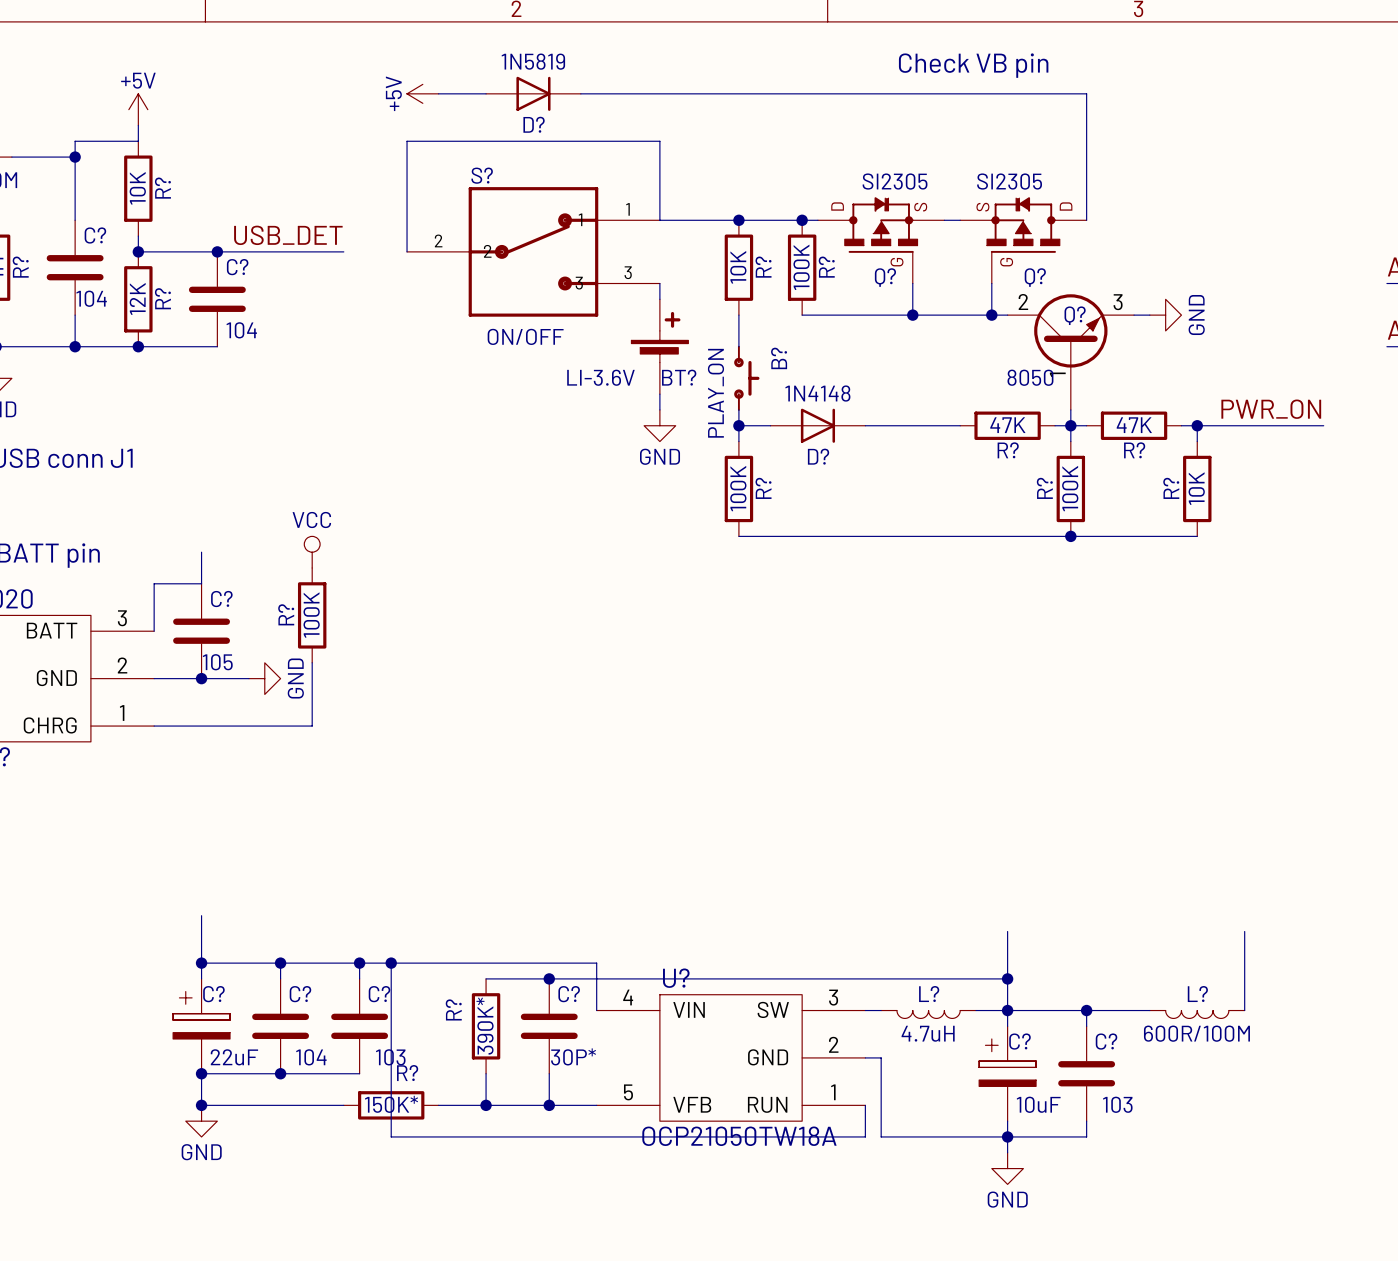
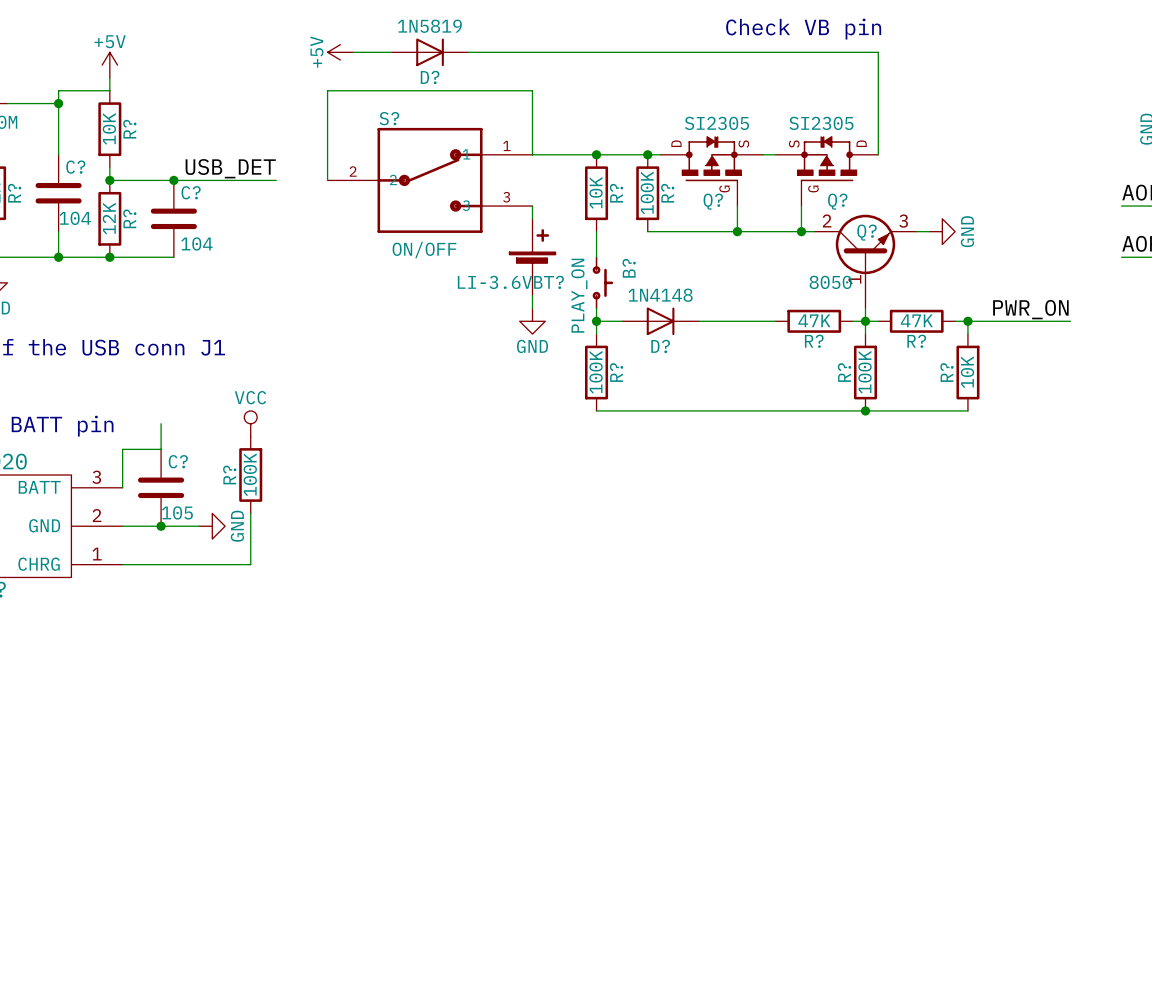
wire: (201, 915) (201, 978) -> none
wire: (1007, 931) (1007, 1026) -> none
wire: (1244, 931) (1244, 1010) -> none
wire: (201, 963) (596, 963) (596, 1010) -> none
junction: (201, 963) -> none
wire: (280, 963) (280, 978) -> none
junction: (280, 963) -> none
wire: (359, 963) (359, 978) -> none
junction: (359, 963) -> none
wire: (391, 963) (391, 1136) (865, 1136) (865, 1105) -> none
junction: (391, 963) -> none
wire: (486, 978) (1007, 978) -> none
junction: (549, 978) -> none
junction: (1007, 978) -> none
wire: (865, 1010) (881, 1010) -> none
wire: (976, 1010) (1149, 1010) -> none
junction: (1007, 1010) -> none
wire: (1086, 1010) (1086, 1026) -> none
junction: (1086, 1010) -> none
L?: 4.7uH (928, 1014) -> none
L?: 600R/100M (1197, 1014) -> none
C?: 22uF (201, 1026) -> none
C?: 104 (280, 1026) -> none
C?: 103 (359, 1026) -> none
R?: 390K* (486, 1026) -> none
C?: 30P* (549, 1026) -> none
U?: OCP21050TW18A (731, 1057) -> none
wire: (865, 1057) (881, 1057) (881, 1136) (1086, 1136) (1086, 1121) -> none
junction: (201, 1073) -> none
junction: (280, 1073) -> none
wire: (359, 1073) (201, 1073) (201, 1105) (343, 1105) -> none
wire: (486, 1073) (486, 1105) -> none
wire: (549, 1073) (549, 1105) -> none
C?: 10uF (1007, 1073) -> none
C?: 103 (1086, 1073) -> none
junction: (201, 1105) -> none
R?: 150K* (391, 1105) -> none
wire: (438, 1105) (596, 1105) -> none
junction: (486, 1105) -> none
junction: (549, 1105) -> none
power symbol: GND (201, 1121) -> none
wire: (1007, 1121) (1007, 1152) -> none
junction: (1007, 1136) -> none
power symbol: GND (1007, 1168) -> none

